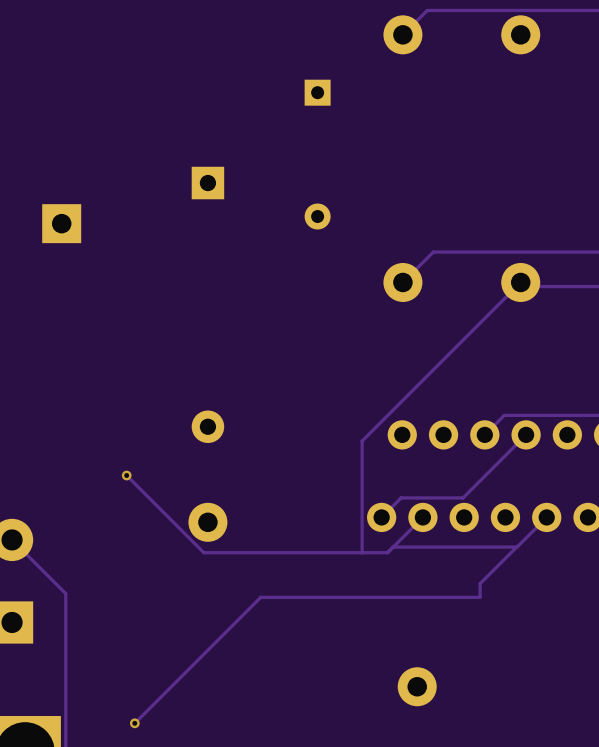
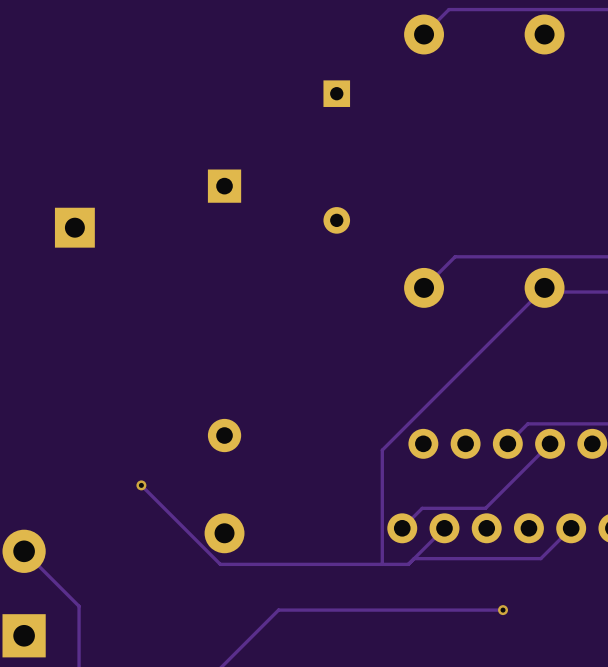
track: (516, 547) (480, 583) (480, 597) -> none
via: none -> (503, 610)

